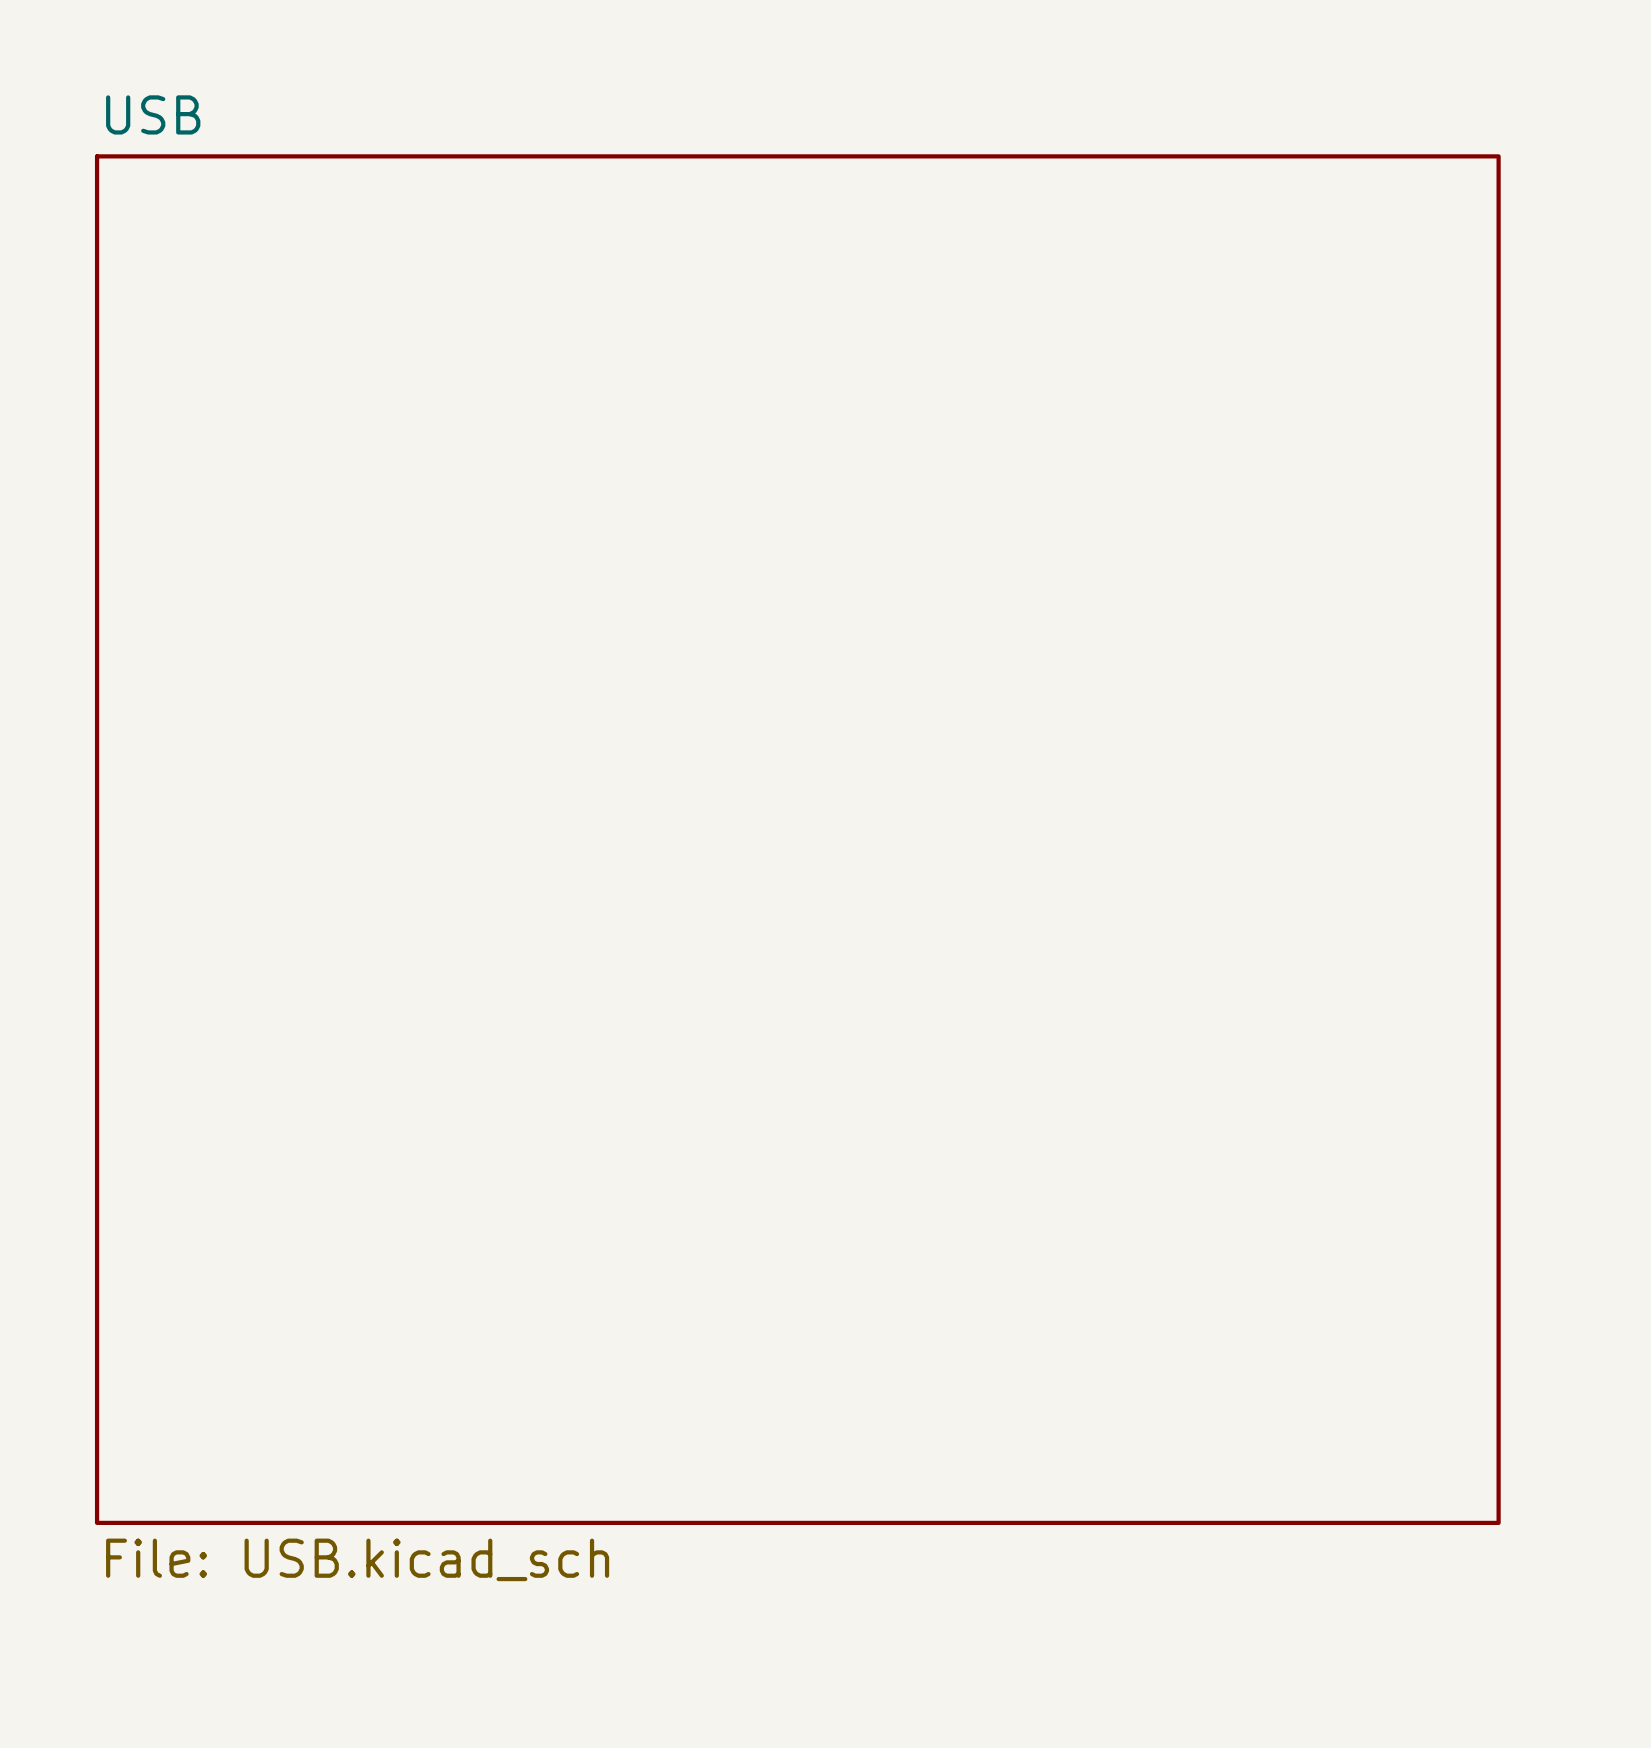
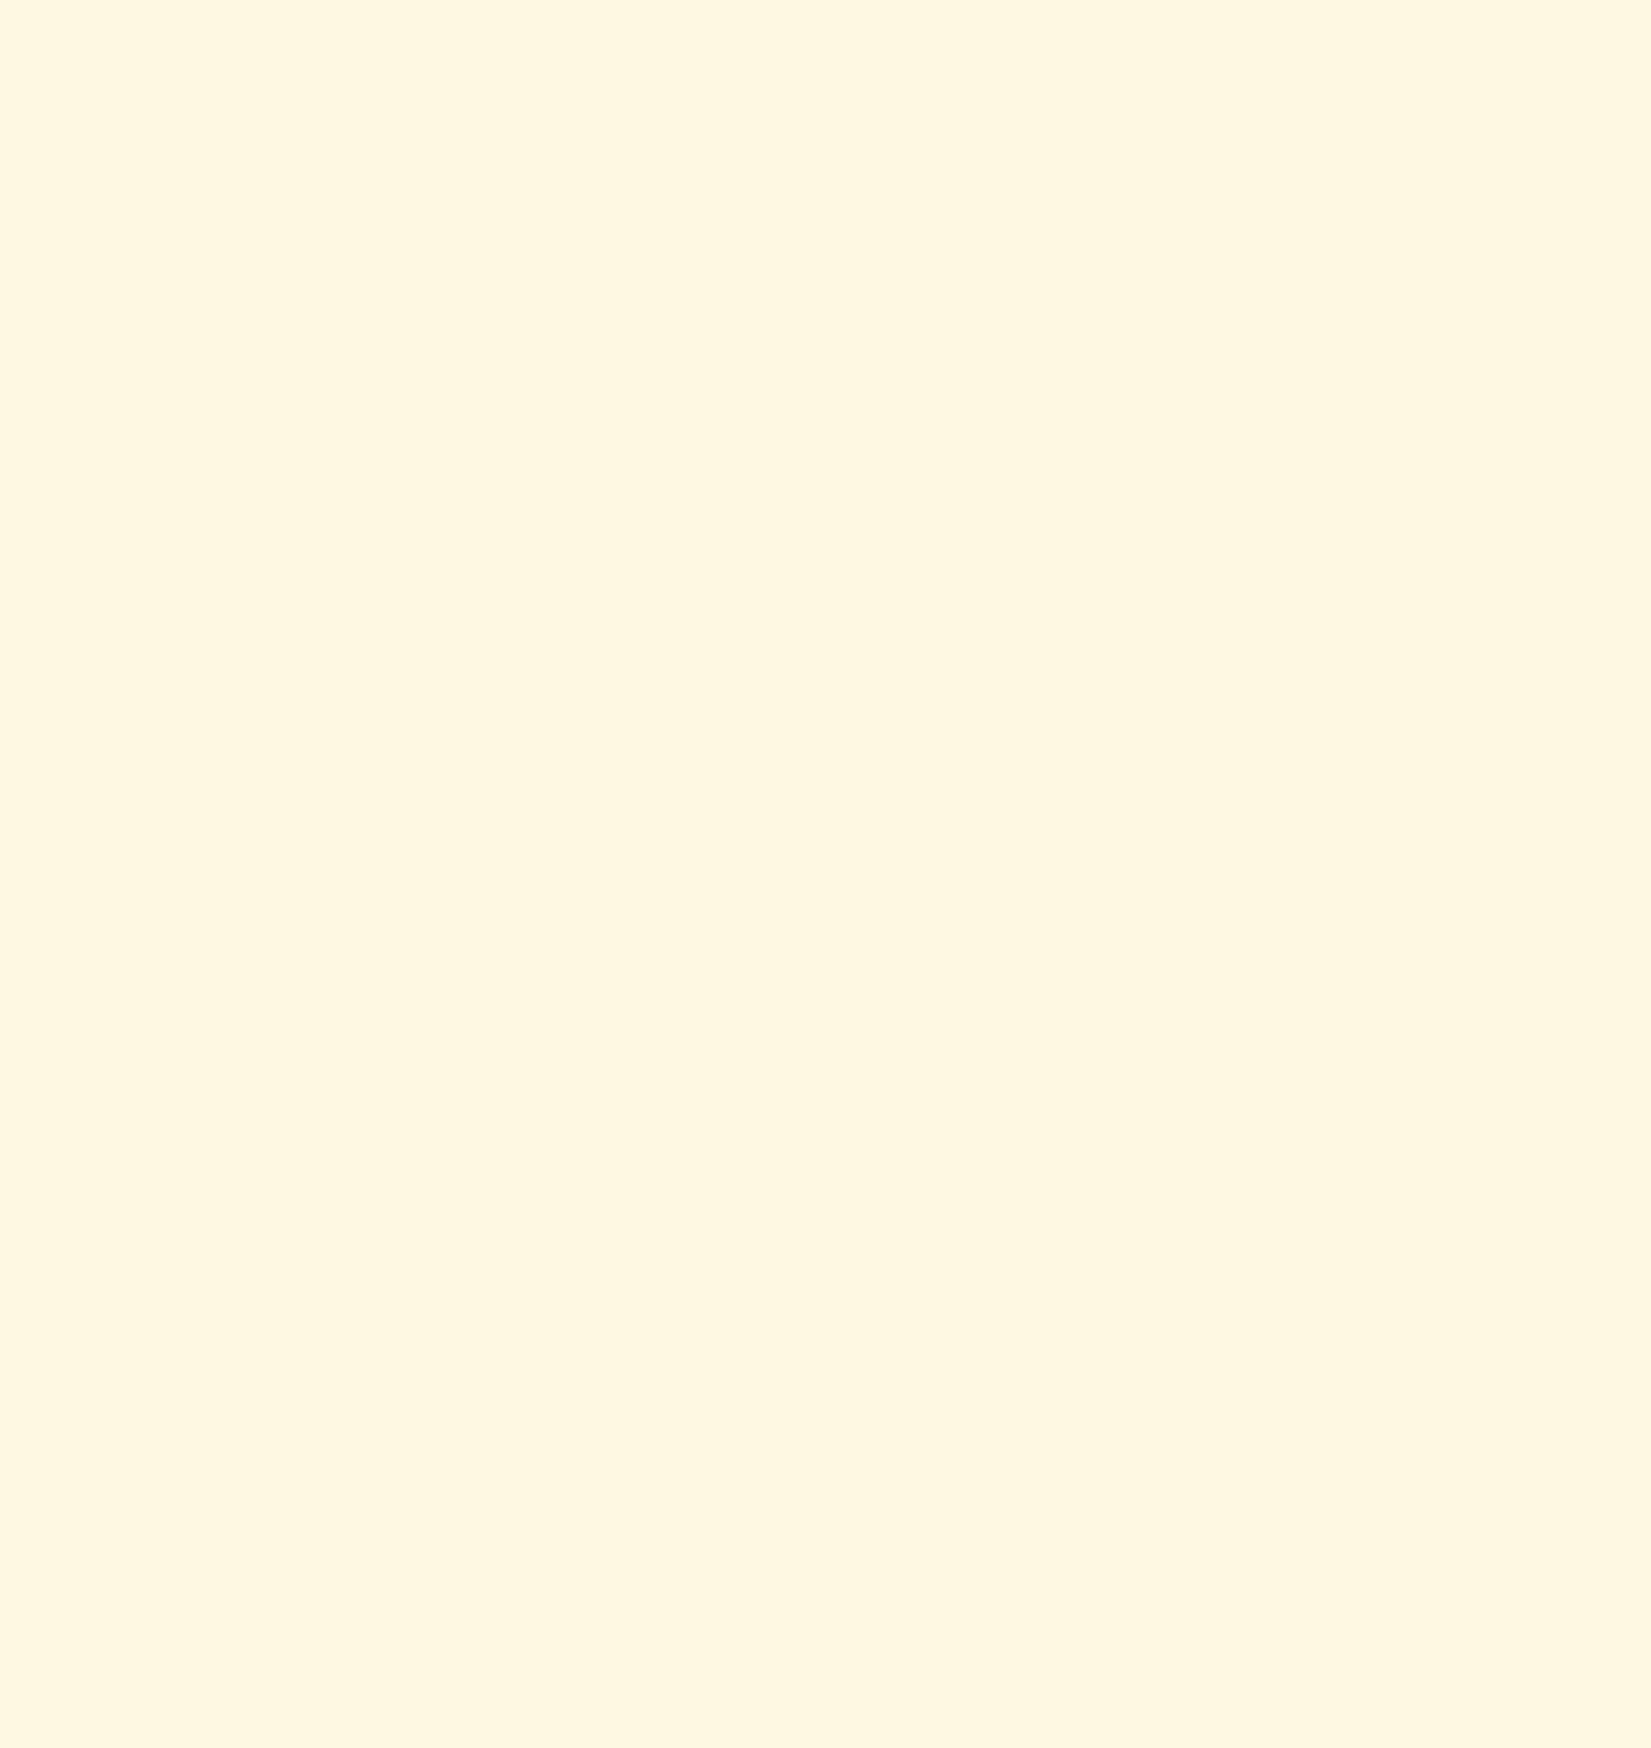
sheet USB: File: USB.kicad_sch (797, 839) -> none

